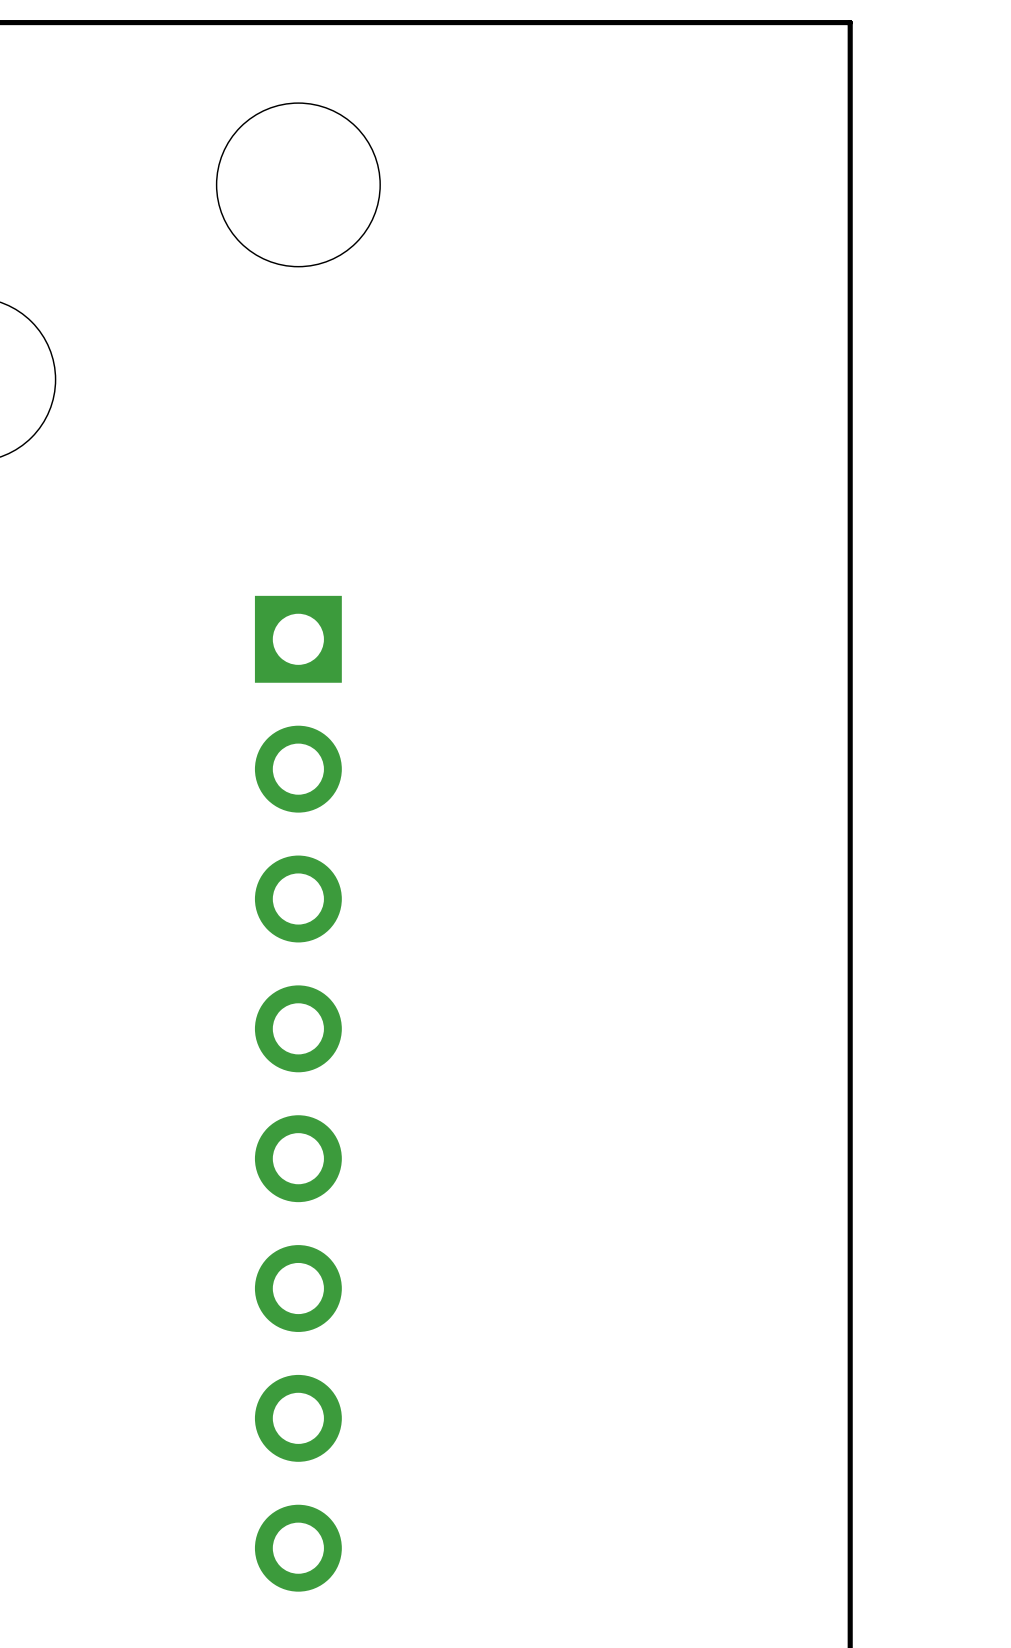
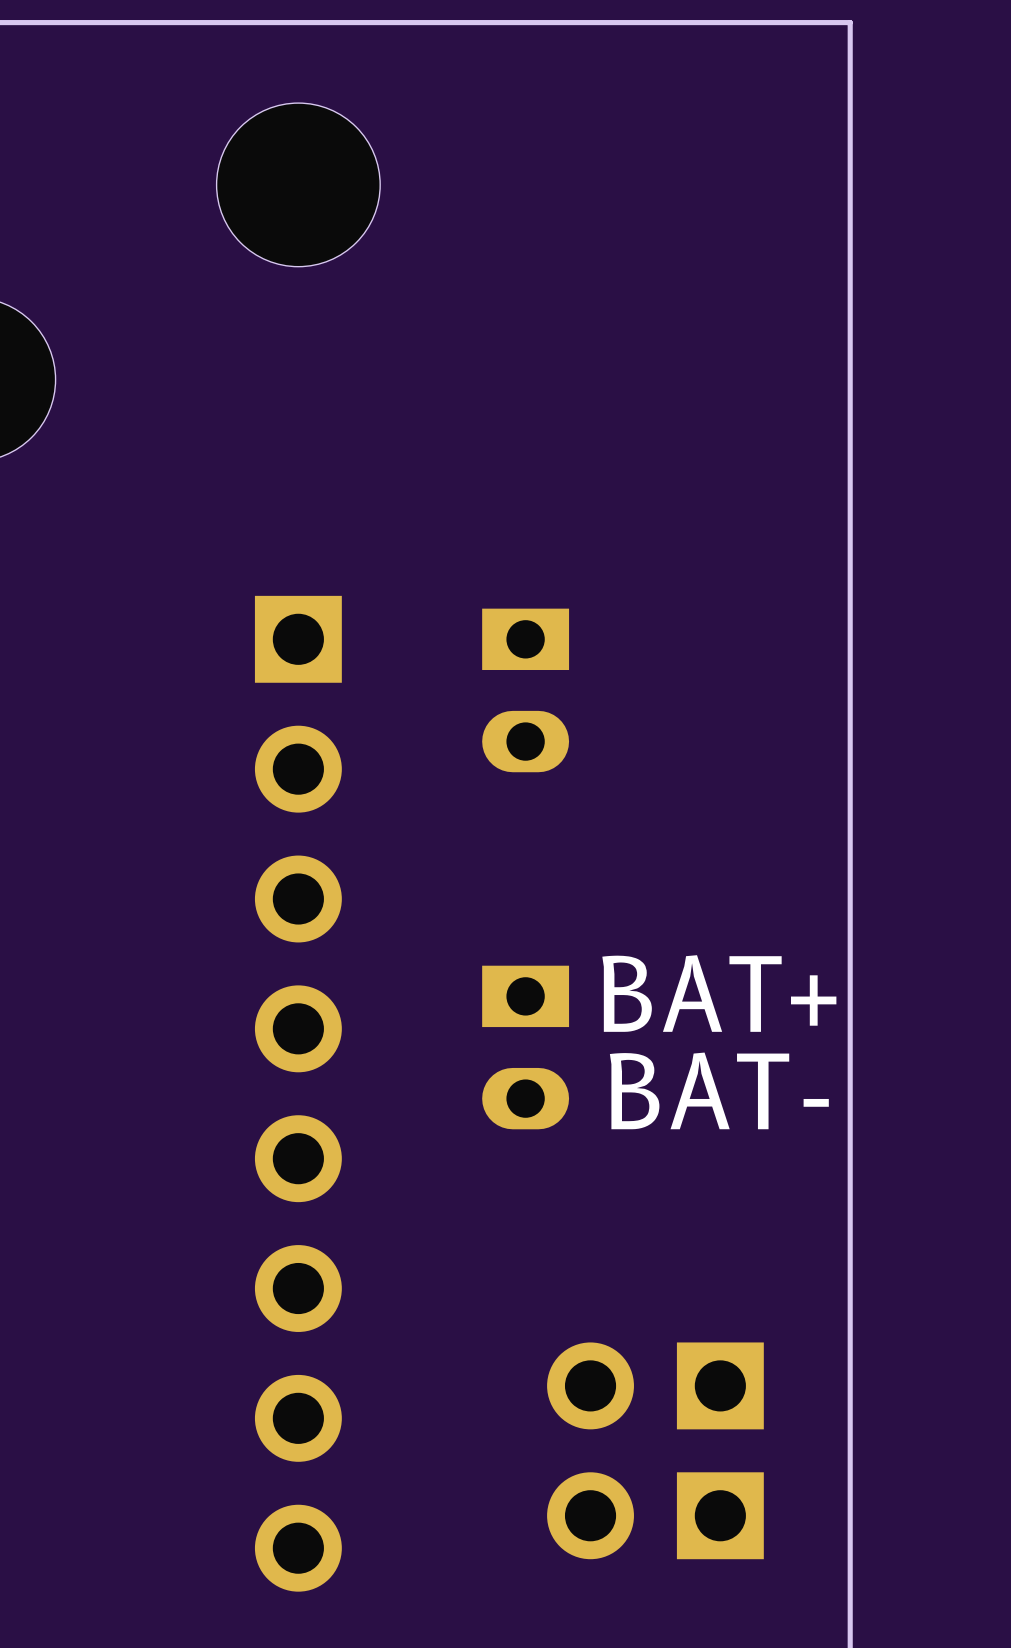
part: none -> (525, 690)
text: none -> BAT+ (719, 993)
part: none -> (525, 1047)
text: none -> BAT- (719, 1090)
part: none -> (655, 1385)
part: none -> (655, 1515)

